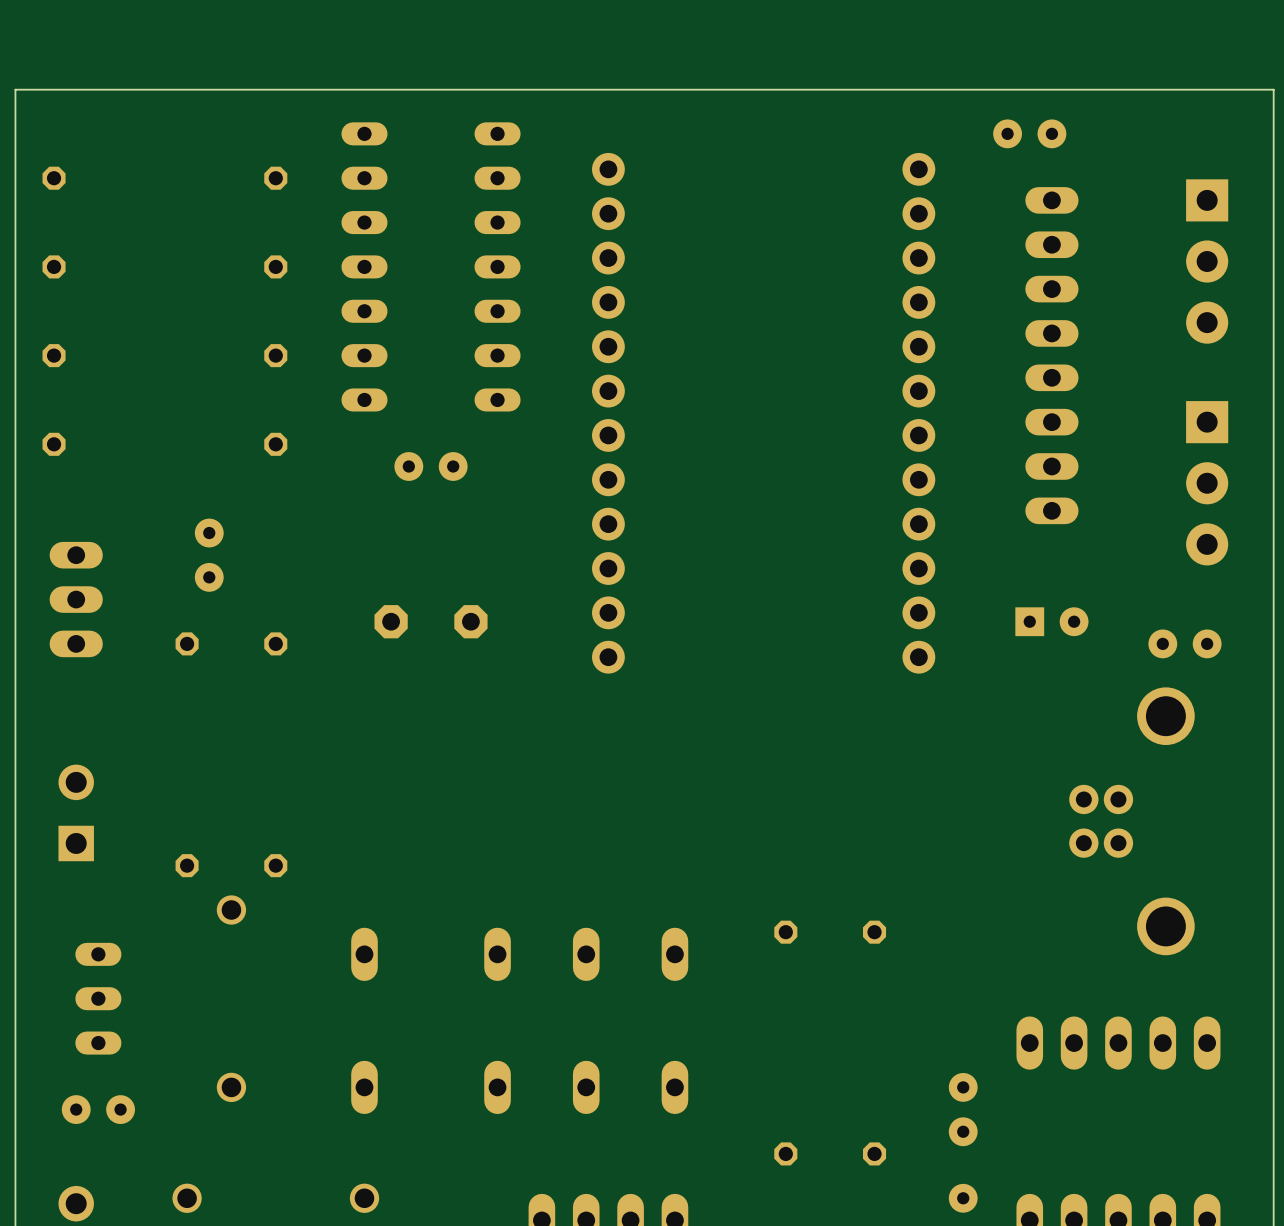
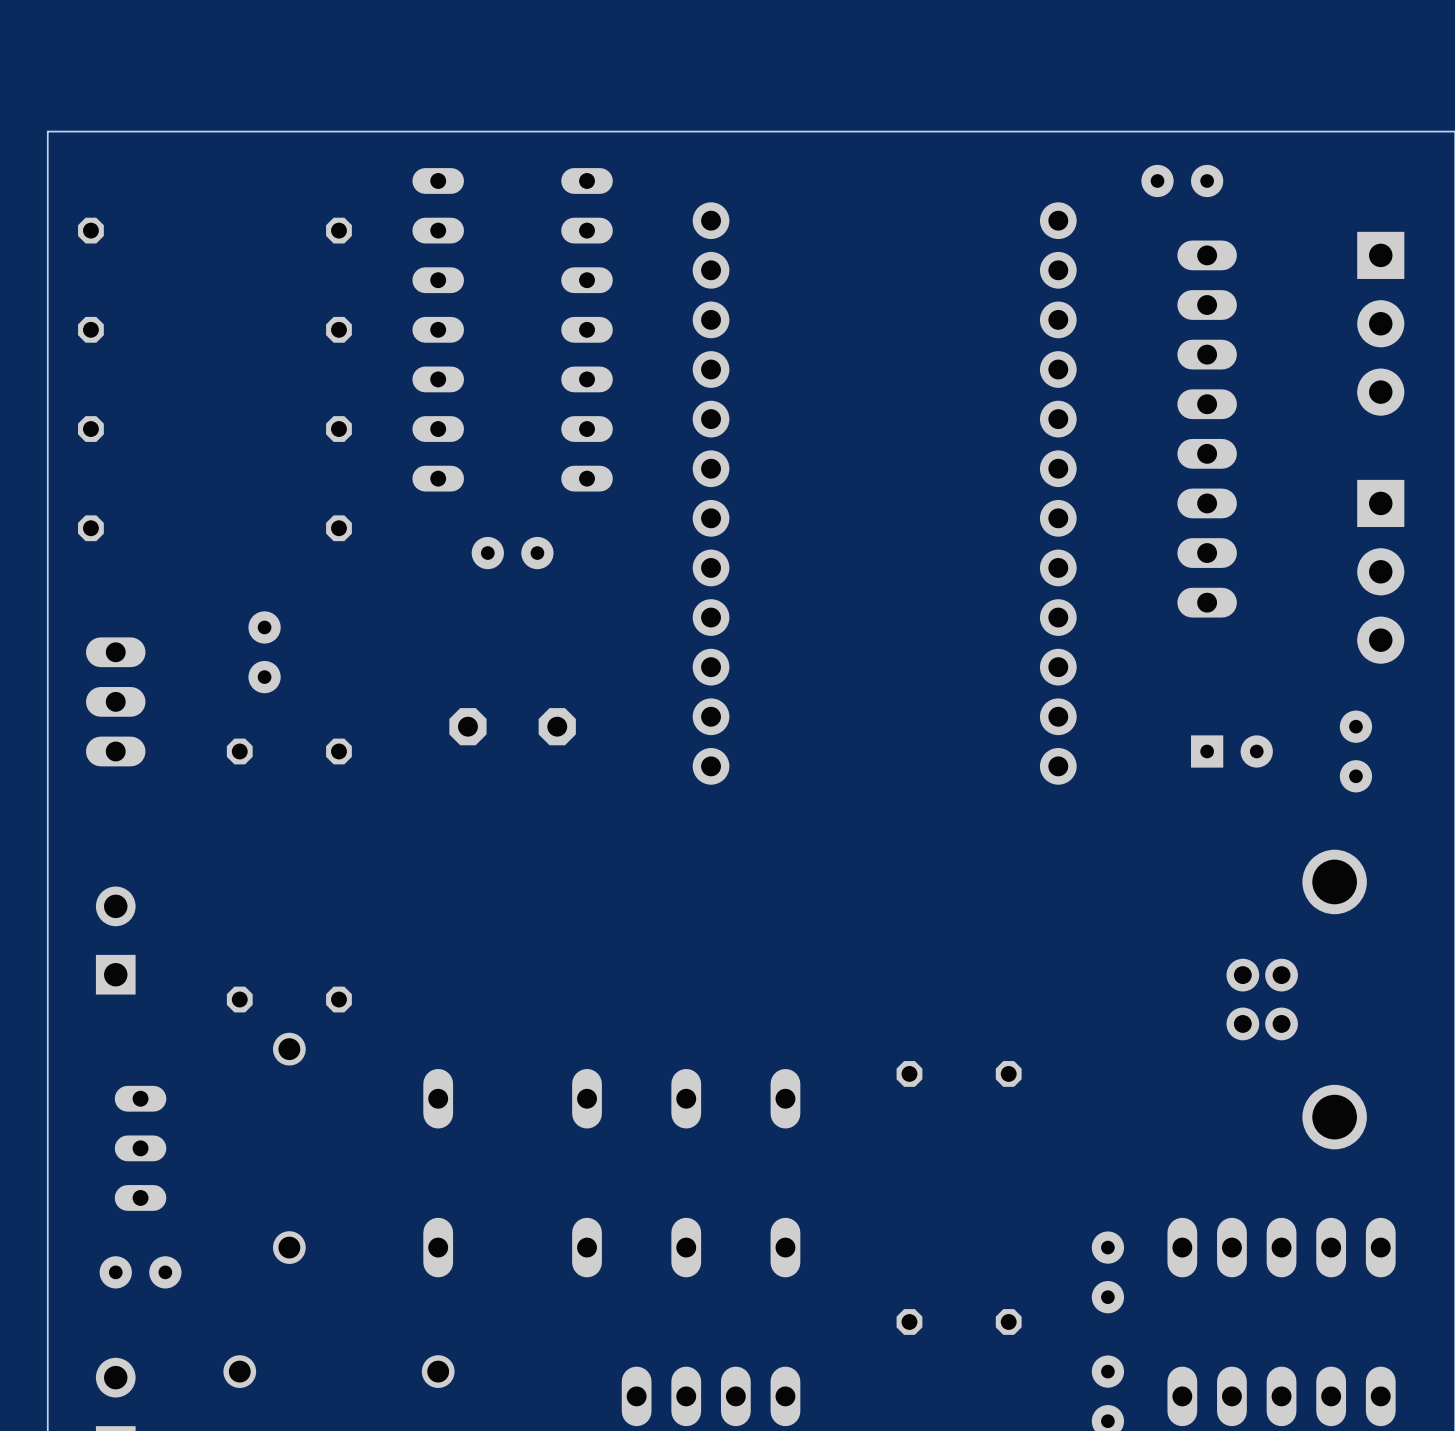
part position: (1051, 621) -> (1231, 751)
part rotation: 0° (1184, 643) -> 90° clockwise (1355, 751)
part position: (1131, 821) -> (1296, 999)
part position: (1118, 1043) -> (1281, 1247)

